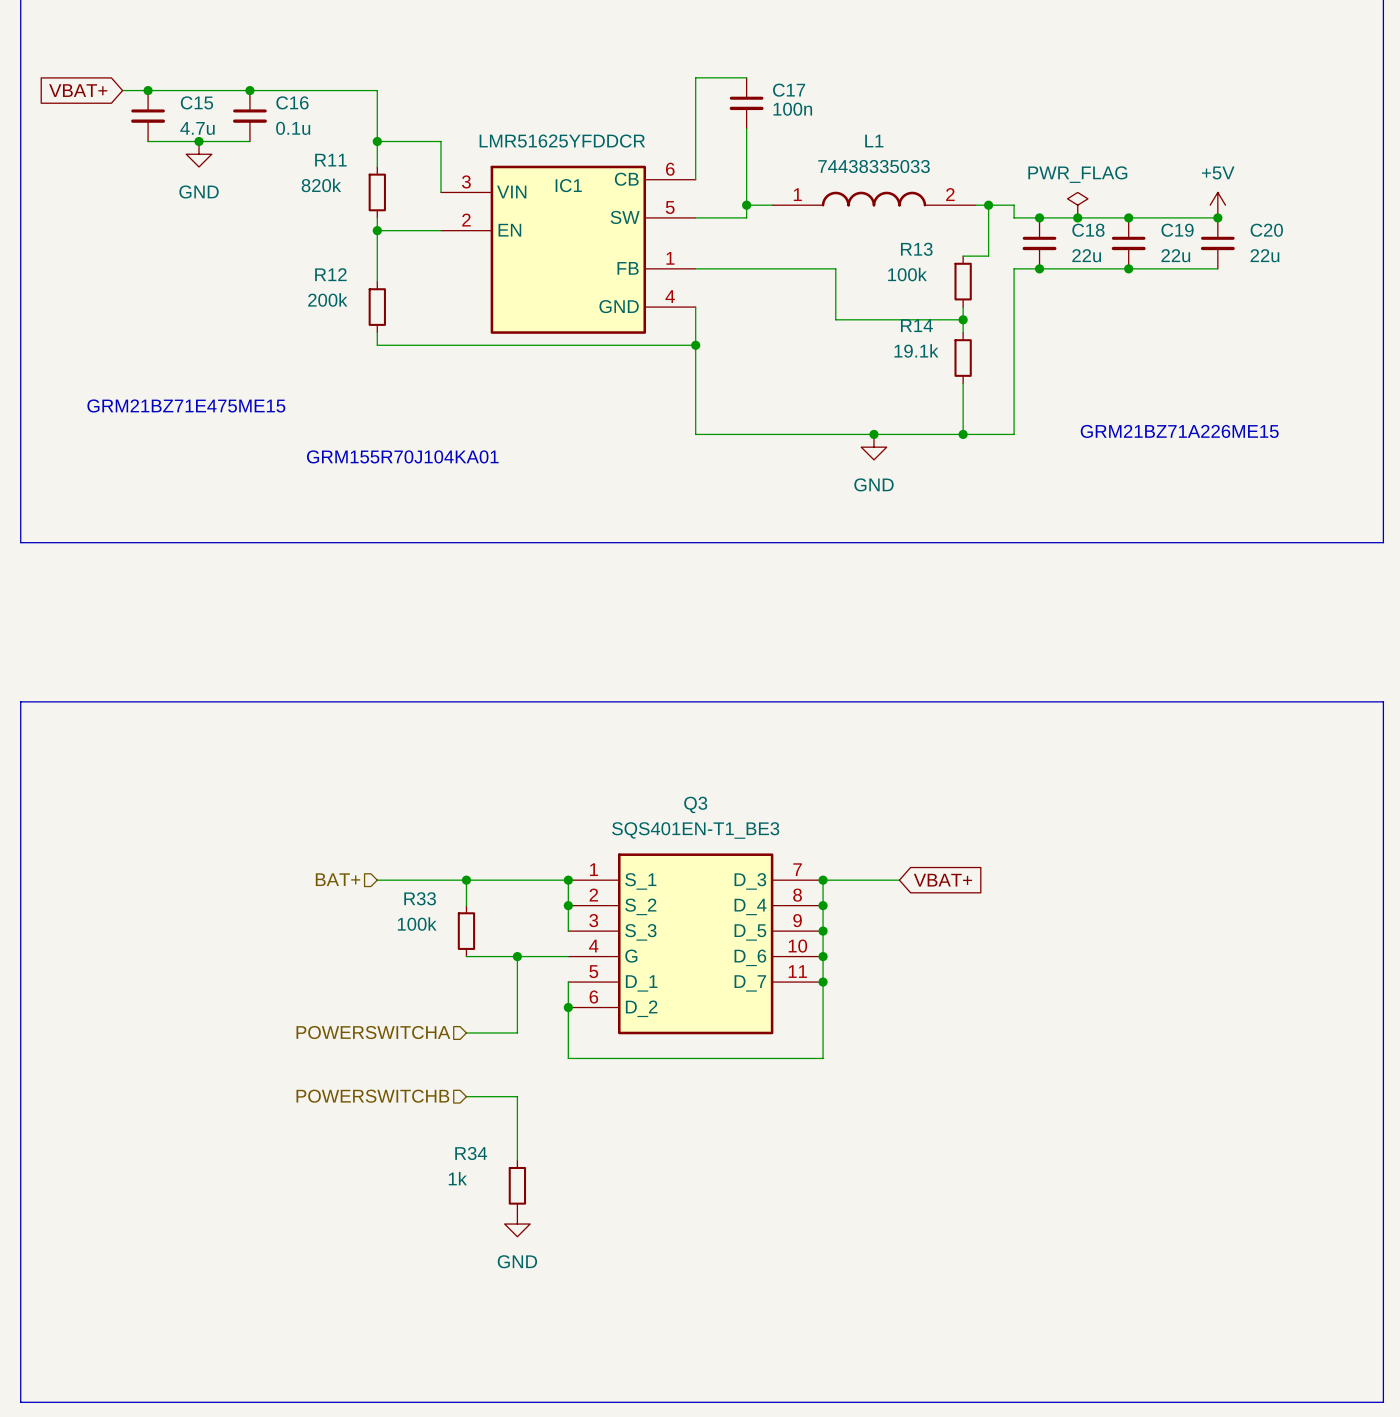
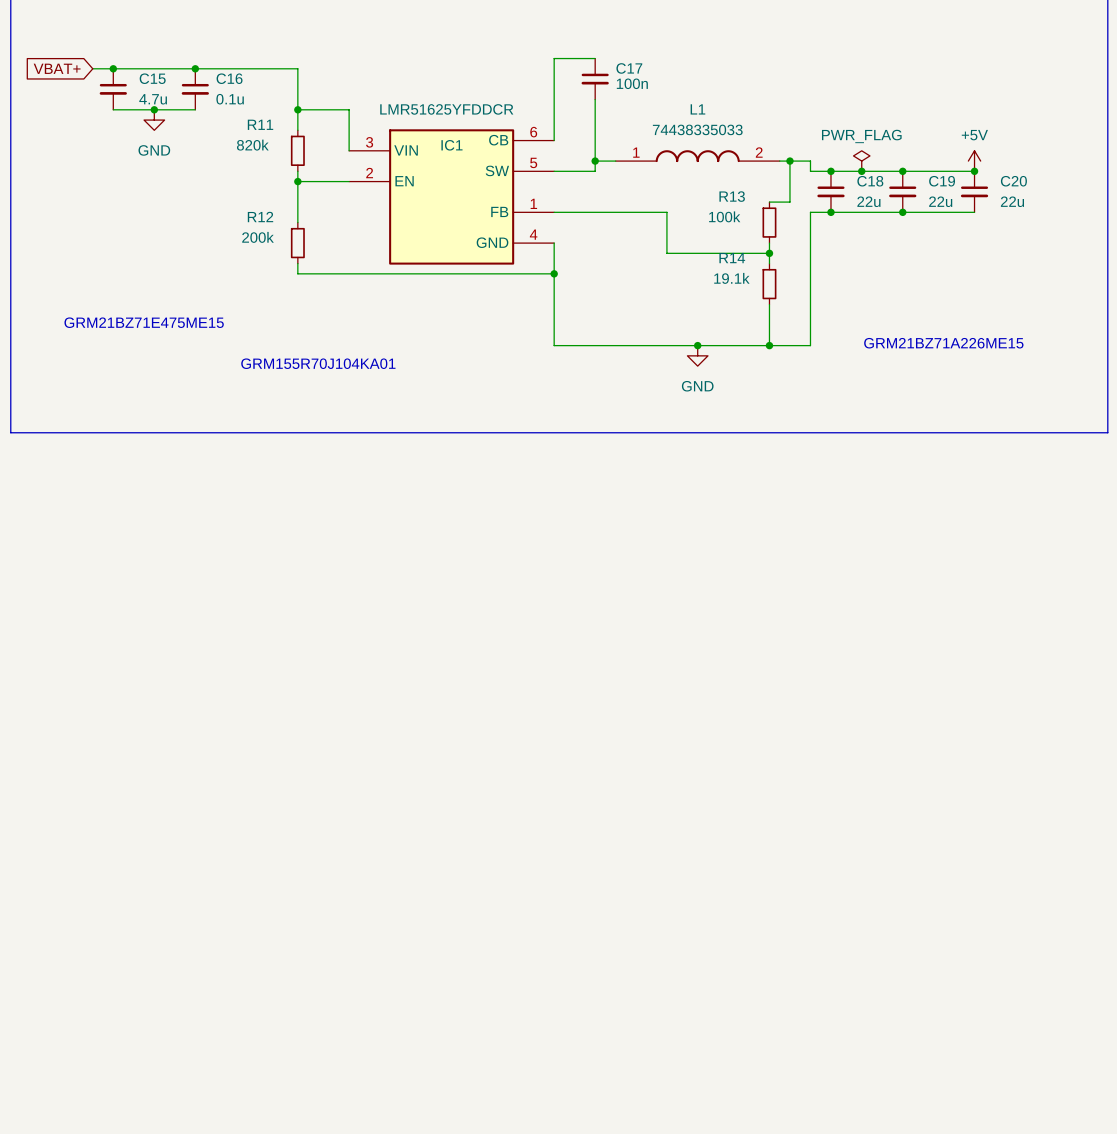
line: (20, 701) (1383, 701) (1383, 1402) (20, 1402) (20, 701) -> none
hierarchical label: BAT+ (338, 879) -> none
wire: (377, 880) (568, 880) (568, 931) -> none
wire: (466, 880) (466, 905) -> none
junction: (466, 880) -> none
junction: (568, 880) -> none
junction: (823, 880) -> none
wire: (899, 880) (823, 880) (823, 1058) (568, 1058) (568, 982) -> none
global label: VBAT+ (942, 880) -> none
junction: (568, 905) -> none
junction: (823, 905) -> none
R33: 100k (466, 931) -> none
junction: (823, 931) -> none
Q3: SQS401EN-T1_BE3 (695, 943) -> none
wire: (466, 956) (568, 956) -> none
wire: (517, 956) (517, 1032) (466, 1032) -> none
junction: (517, 956) -> none
junction: (823, 956) -> none
junction: (823, 982) -> none
junction: (568, 1007) -> none
hierarchical label: POWERSWITCHA (373, 1032) -> none
hierarchical label: POWERSWITCHB (372, 1096) -> none
wire: (466, 1096) (517, 1096) (517, 1160) -> none
R34: 1k (517, 1185) -> none
power symbol: GND (517, 1224) -> none

